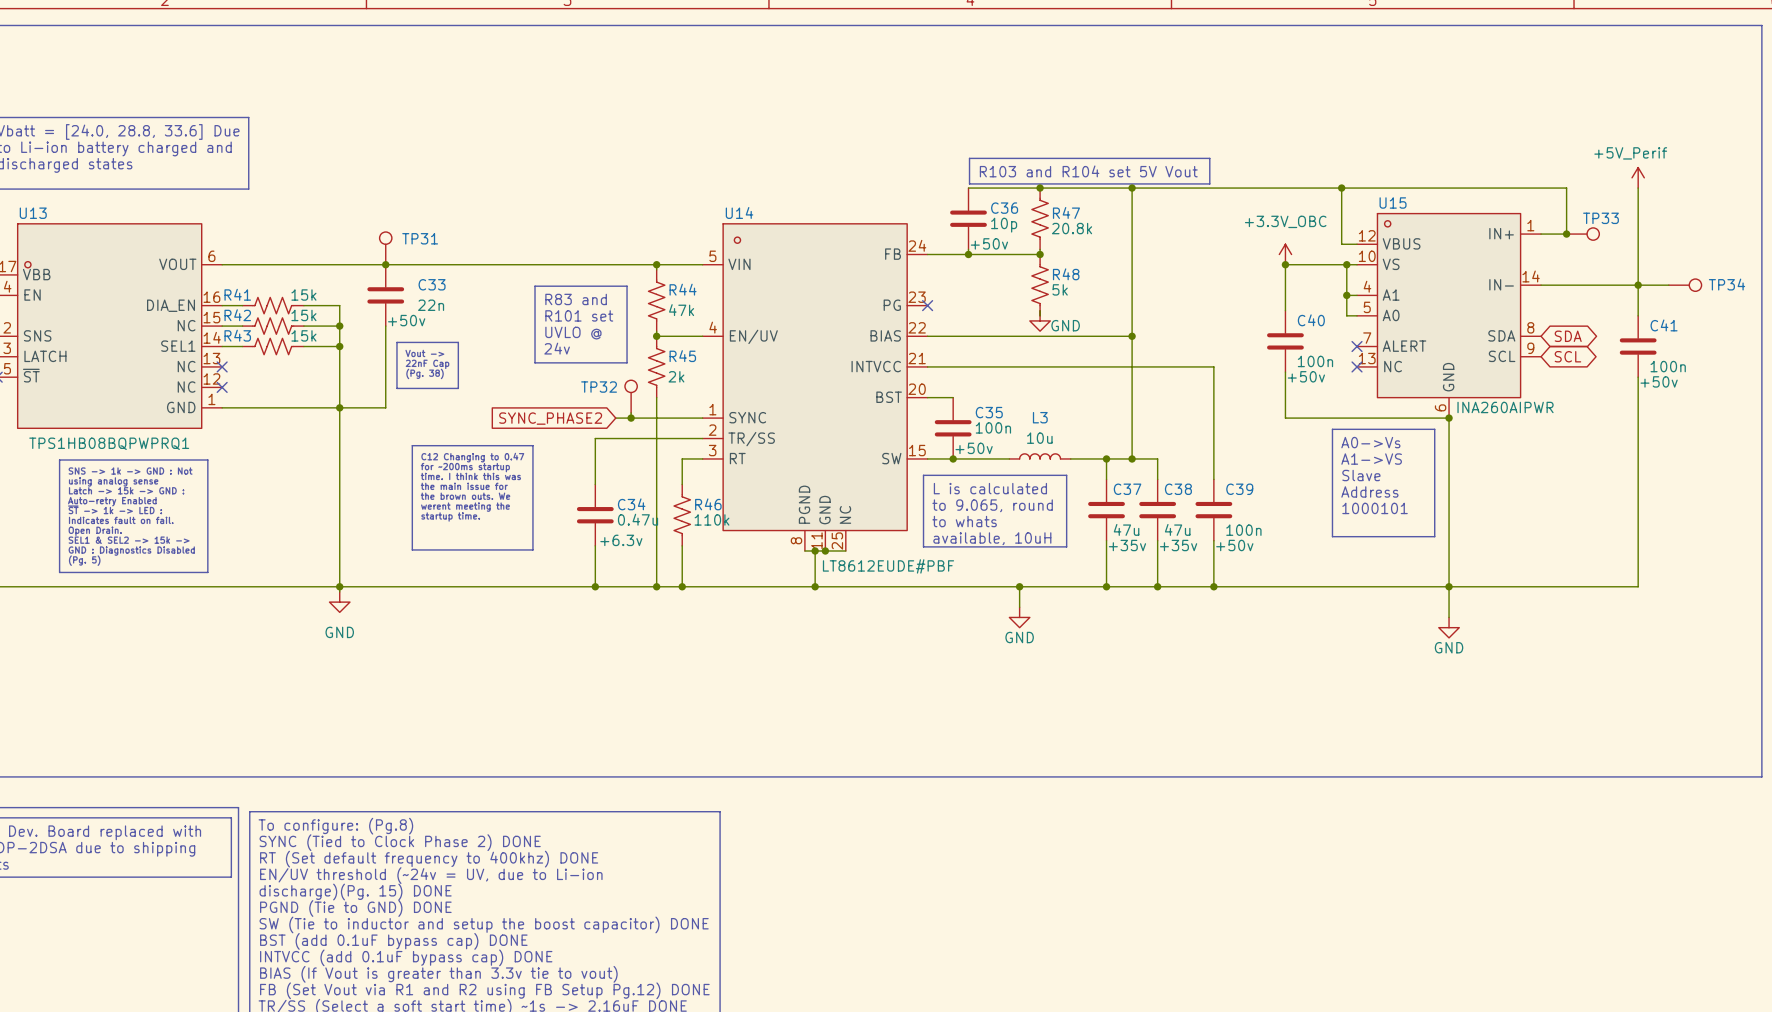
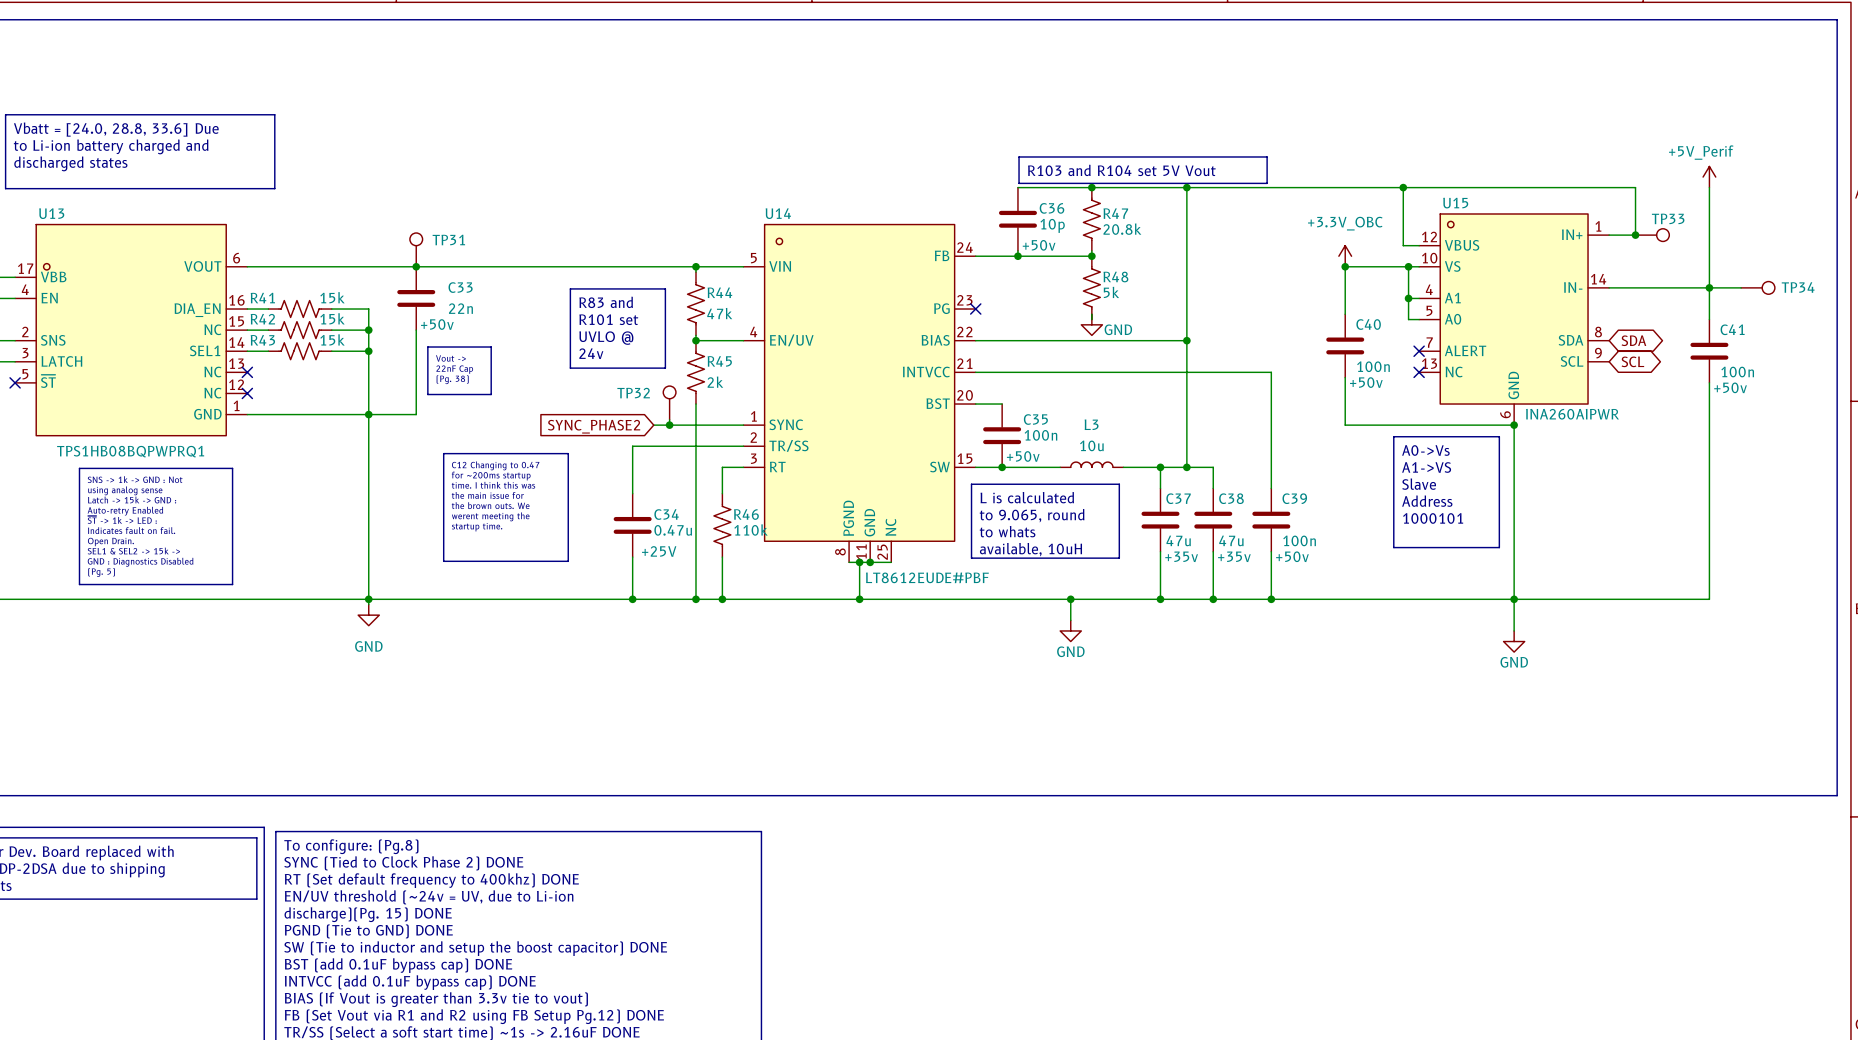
C34 text: +6.3v (621, 540) -> +25V (659, 551)

